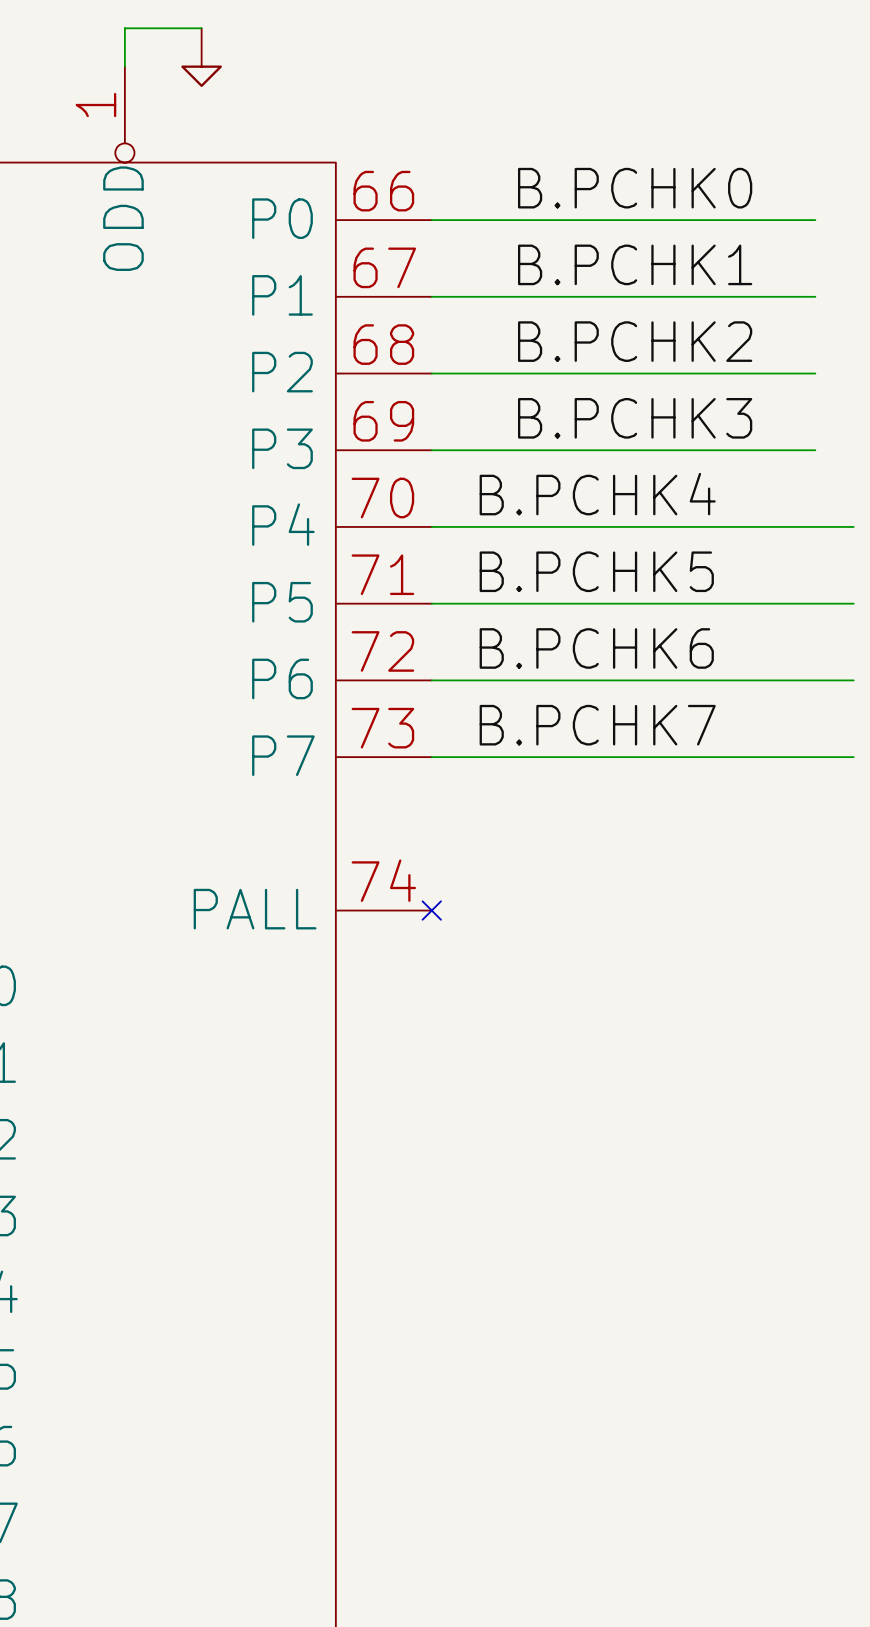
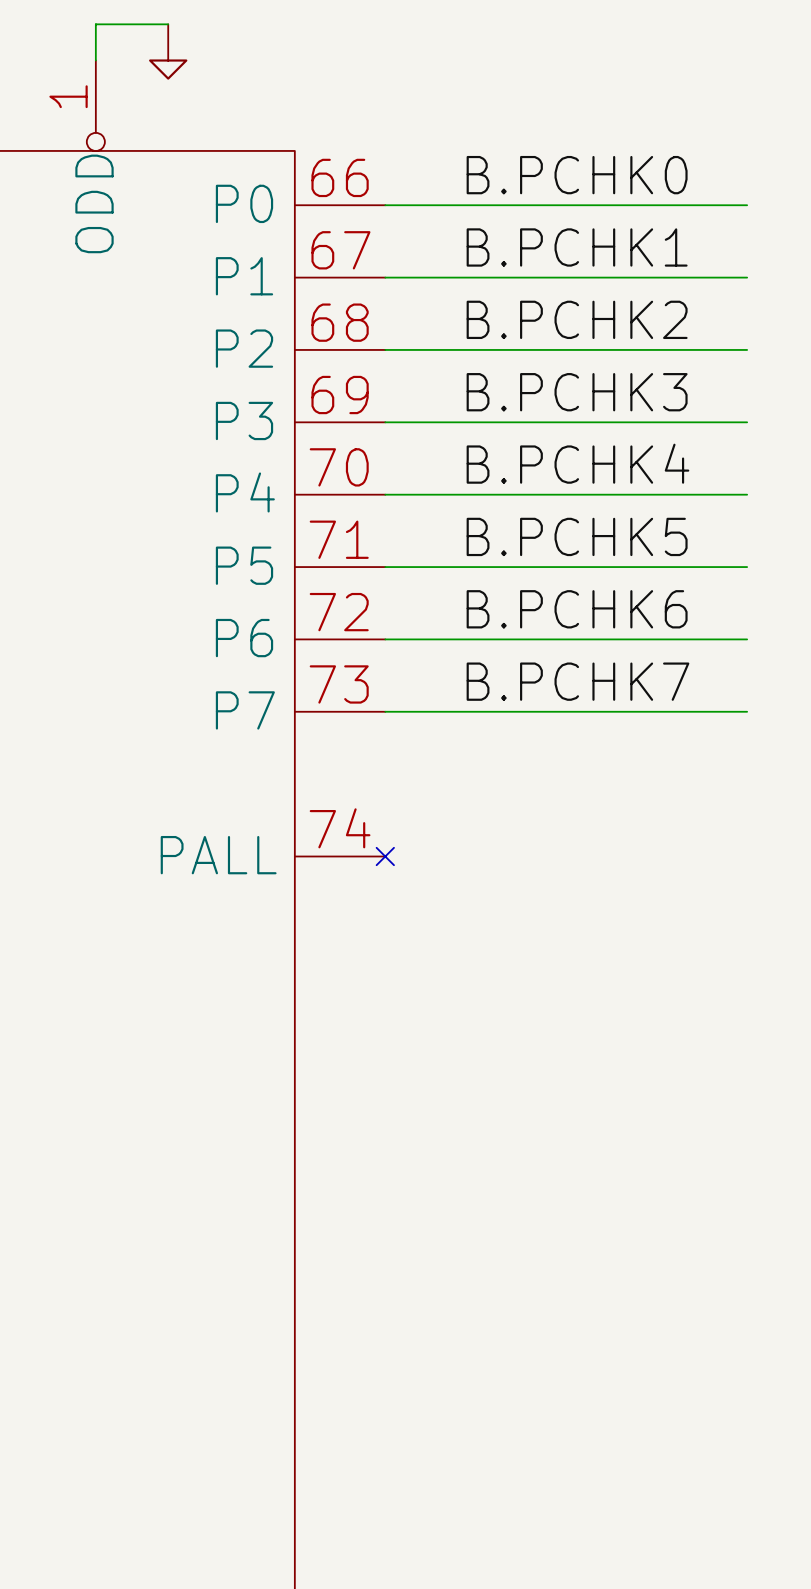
label position: B.PCHK4 (597, 494) -> B.PCHK4 (577, 463)
wire: (815, 526) (853, 526) -> none
label position: B.PCHK5 (596, 571) -> B.PCHK5 (577, 536)
wire: (815, 603) (853, 603) -> none
label position: B.PCHK6 (596, 648) -> B.PCHK6 (577, 609)
wire: (815, 680) (853, 680) -> none
label position: B.PCHK7 (597, 725) -> B.PCHK7 (577, 681)
wire: (815, 757) (853, 757) -> none

